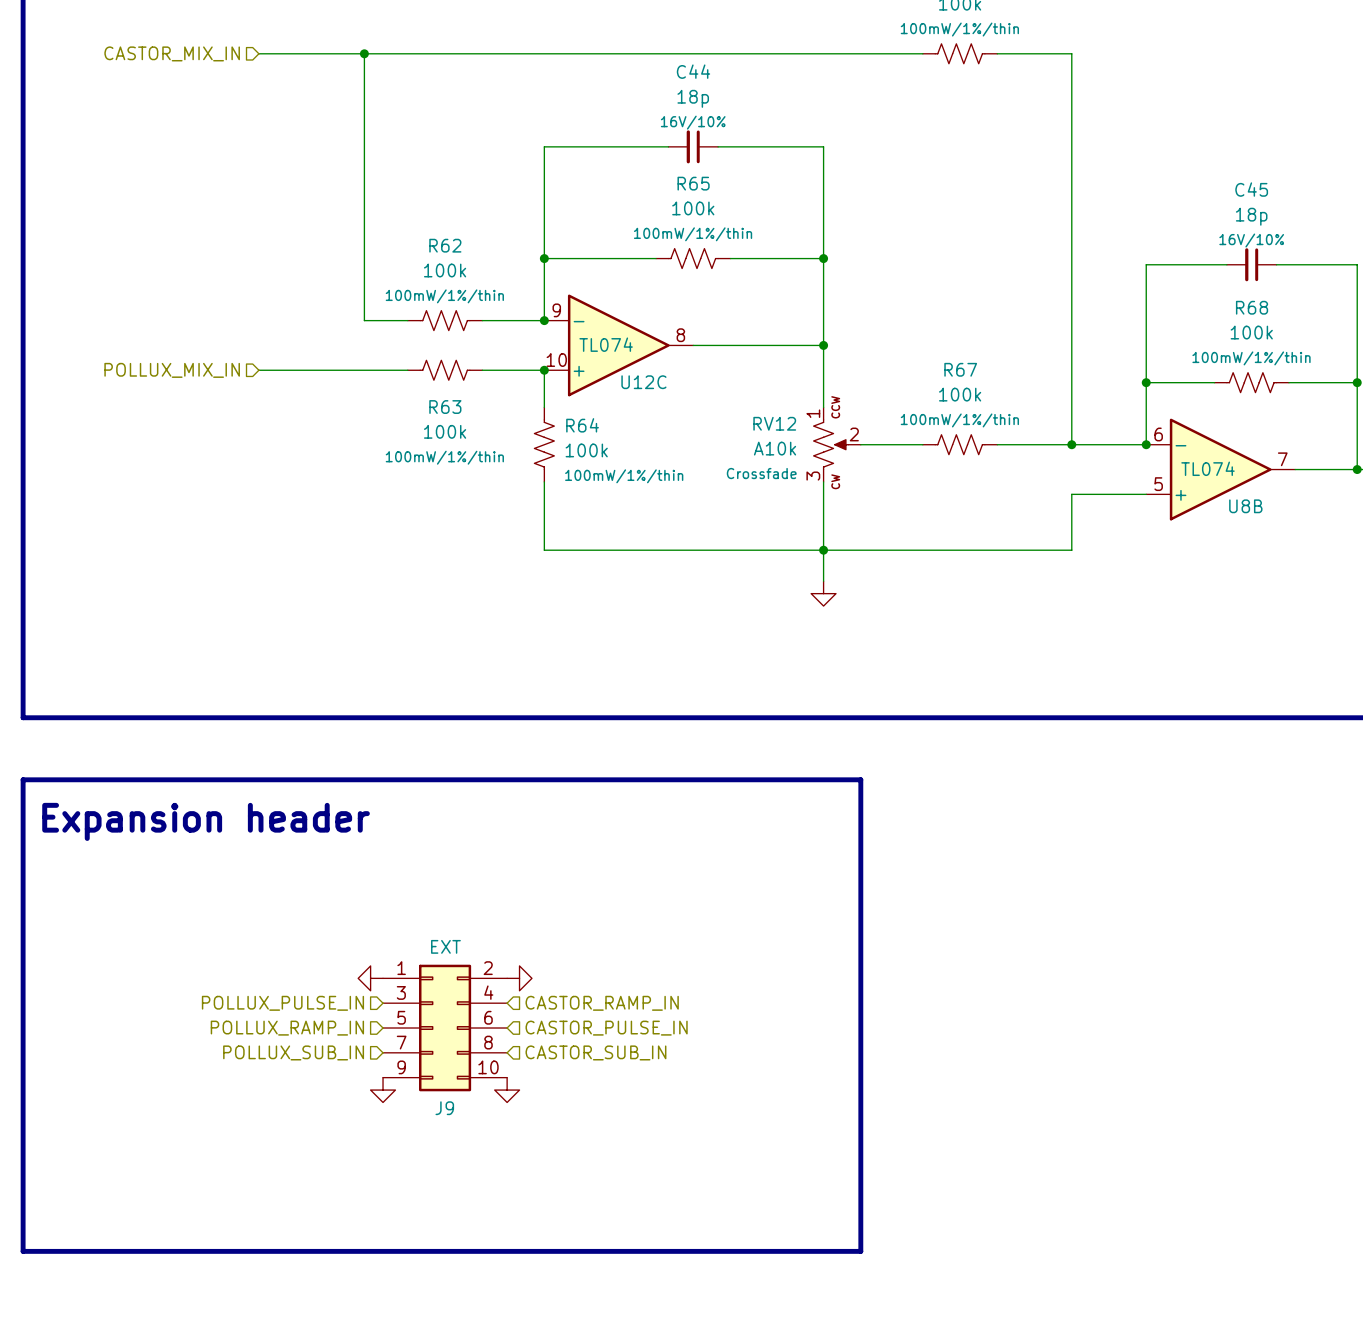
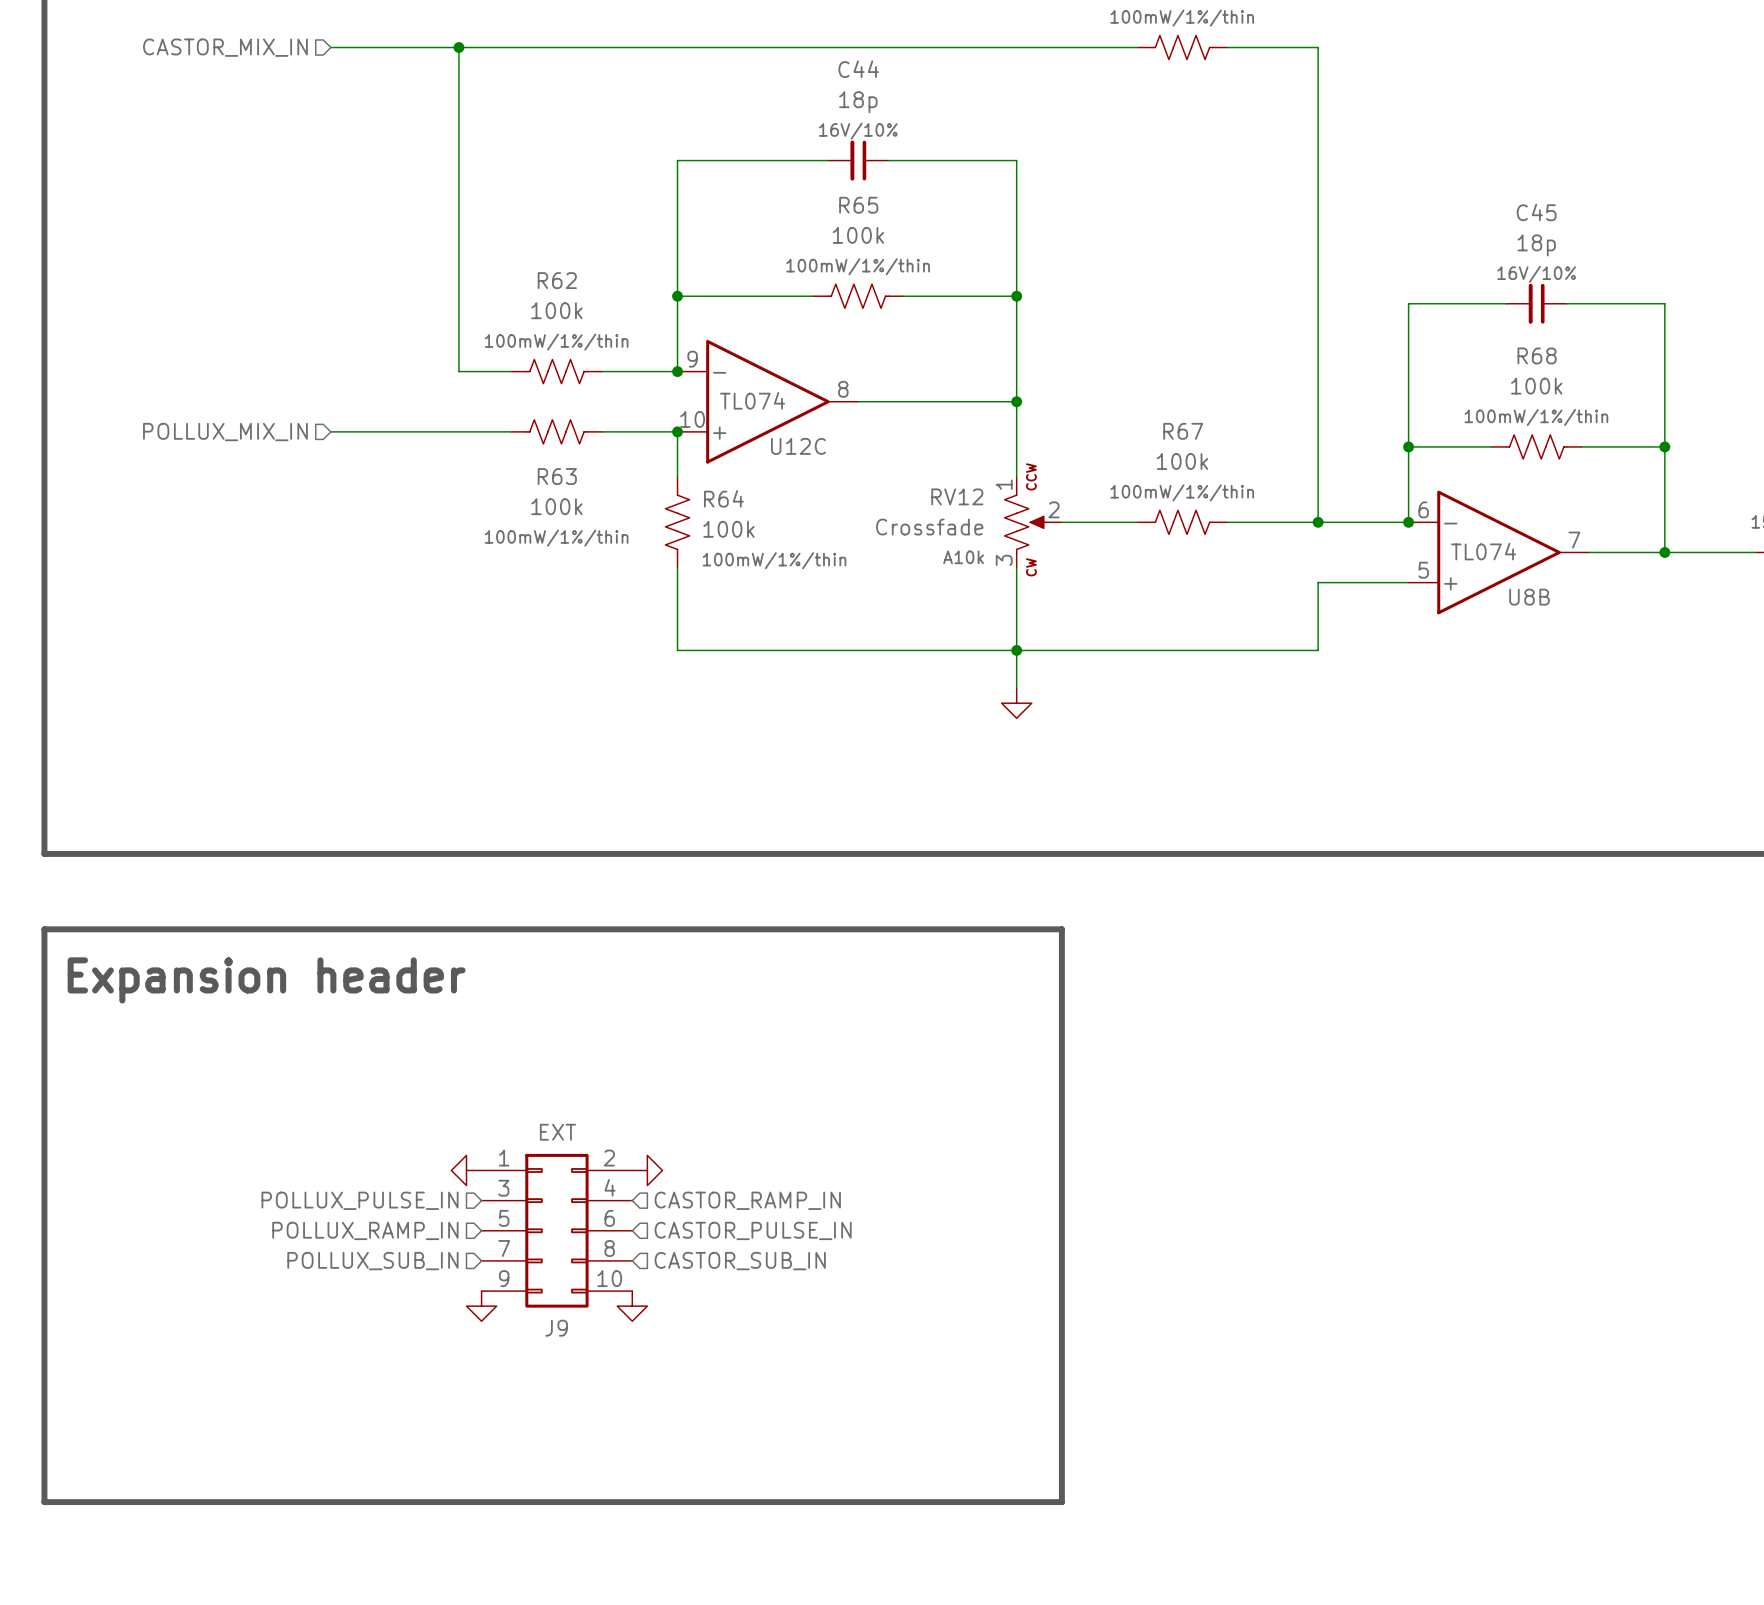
RV12 value: A10k (775, 448) -> Crossfade (929, 527)
RV12 text: Crossfade (761, 473) -> A10k (963, 557)

